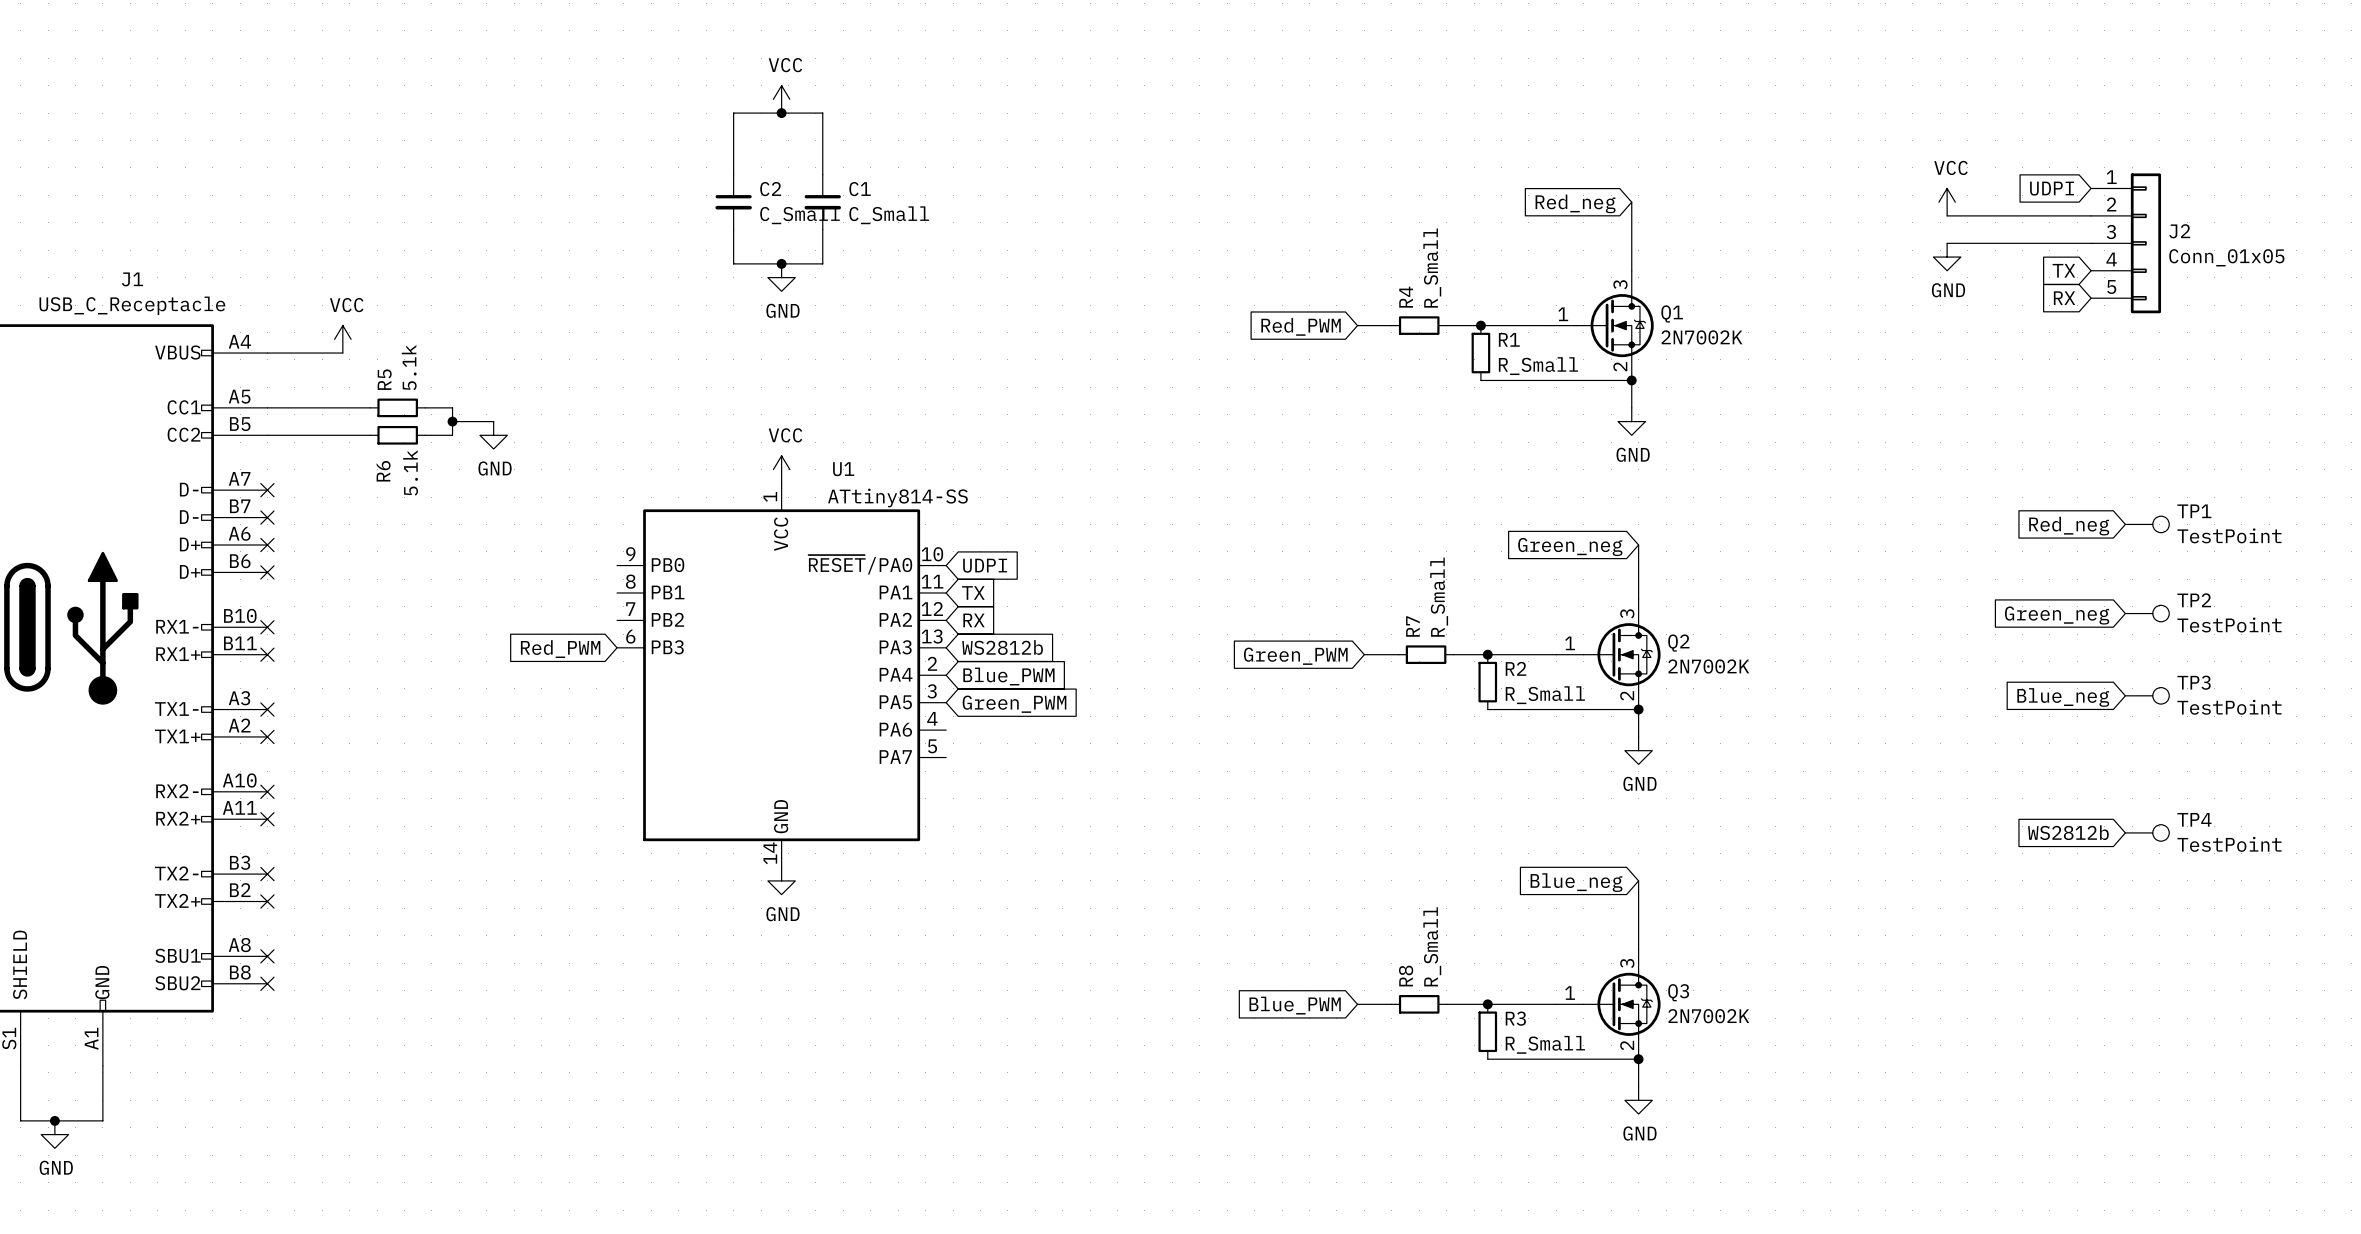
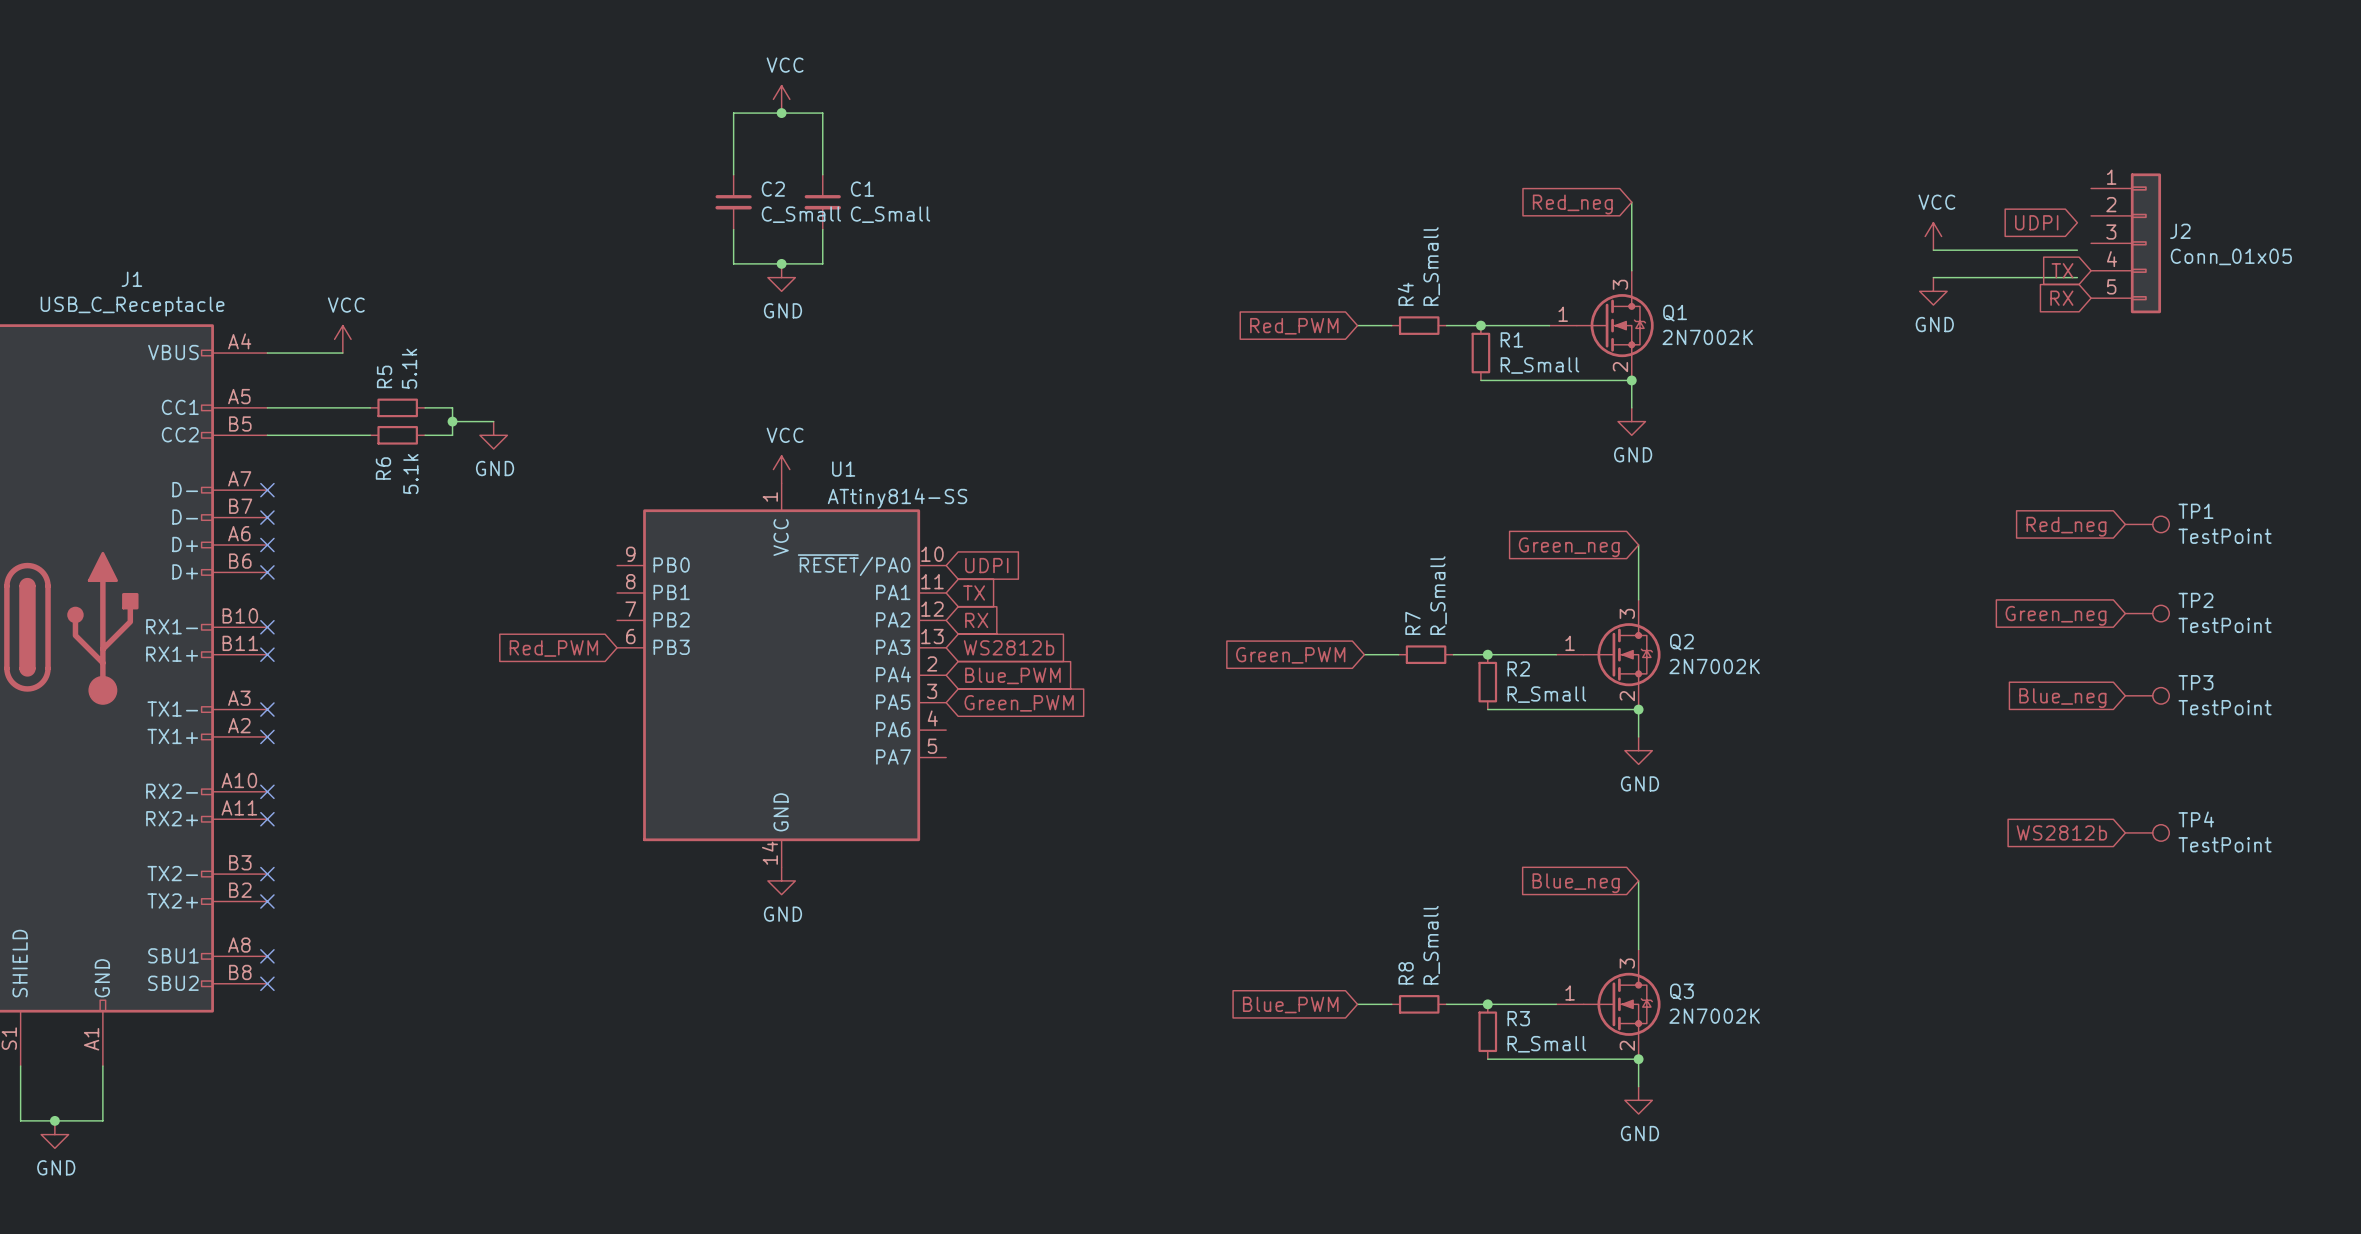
global label position: UDPI (2052, 188) -> UDPI (2036, 222)
power symbol position: VCC (1947, 202) -> VCC (1933, 236)
wire: (1947, 215) (2091, 215) -> (1933, 250) (2077, 250)
wire: (1947, 243) (2091, 243) -> (1933, 277) (2077, 277)
power symbol position: GND (1947, 257) -> GND (1933, 291)

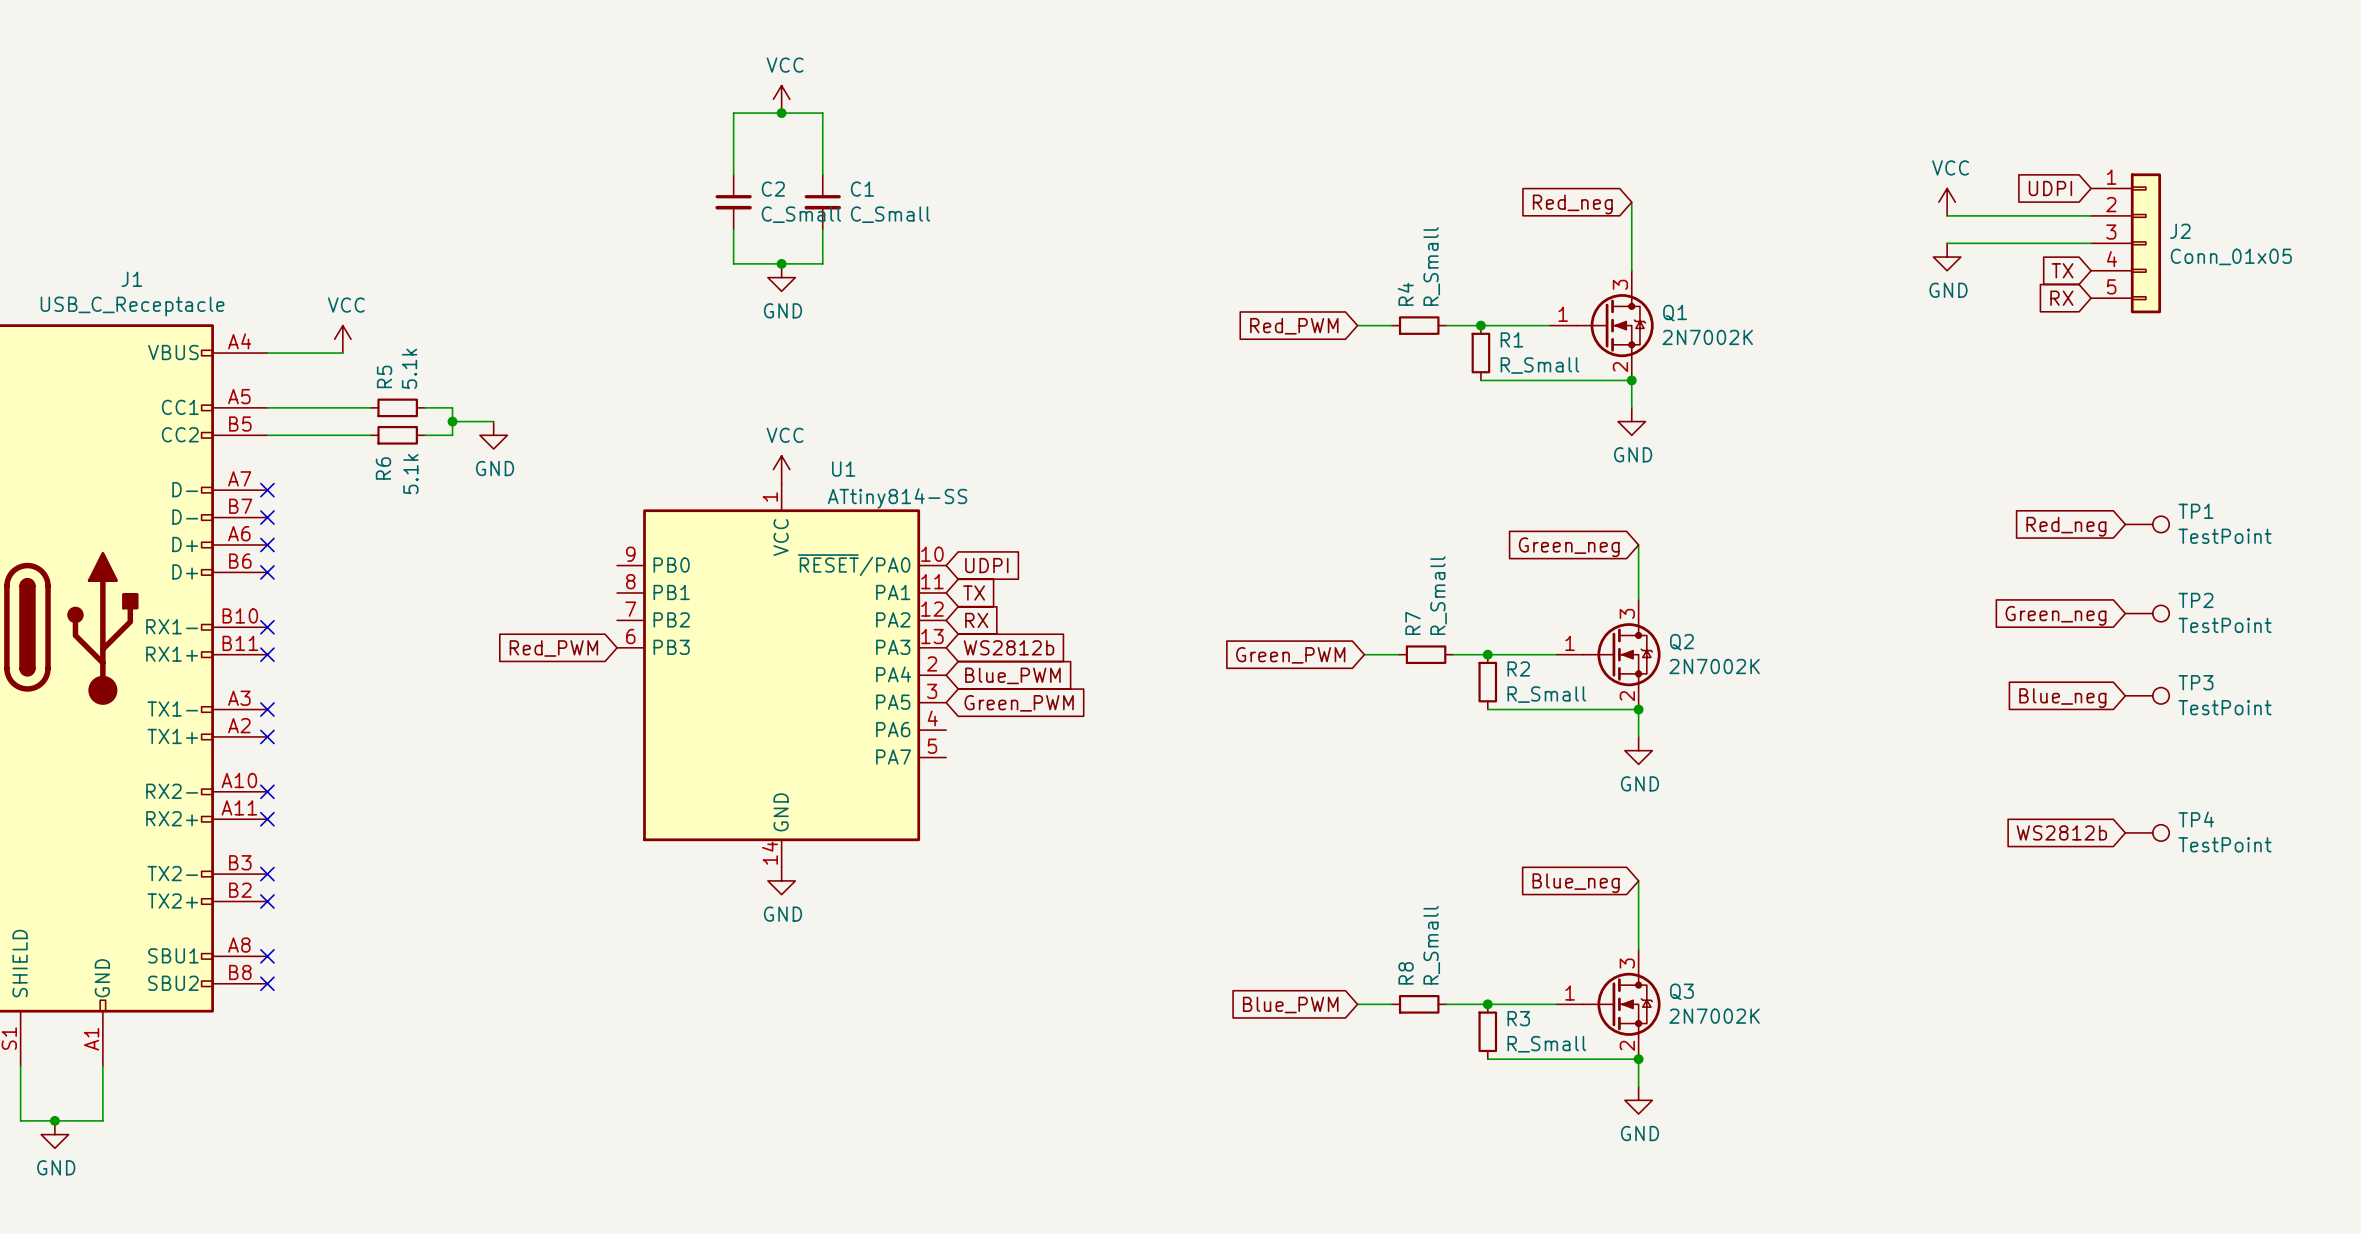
global label position: UDPI (2036, 222) -> UDPI (2050, 188)
power symbol position: VCC (1933, 236) -> VCC (1947, 202)
wire: (1933, 250) (2077, 250) -> (1947, 215) (2091, 215)
wire: (1933, 277) (2077, 277) -> (1947, 243) (2091, 243)
power symbol position: GND (1933, 291) -> GND (1947, 257)

